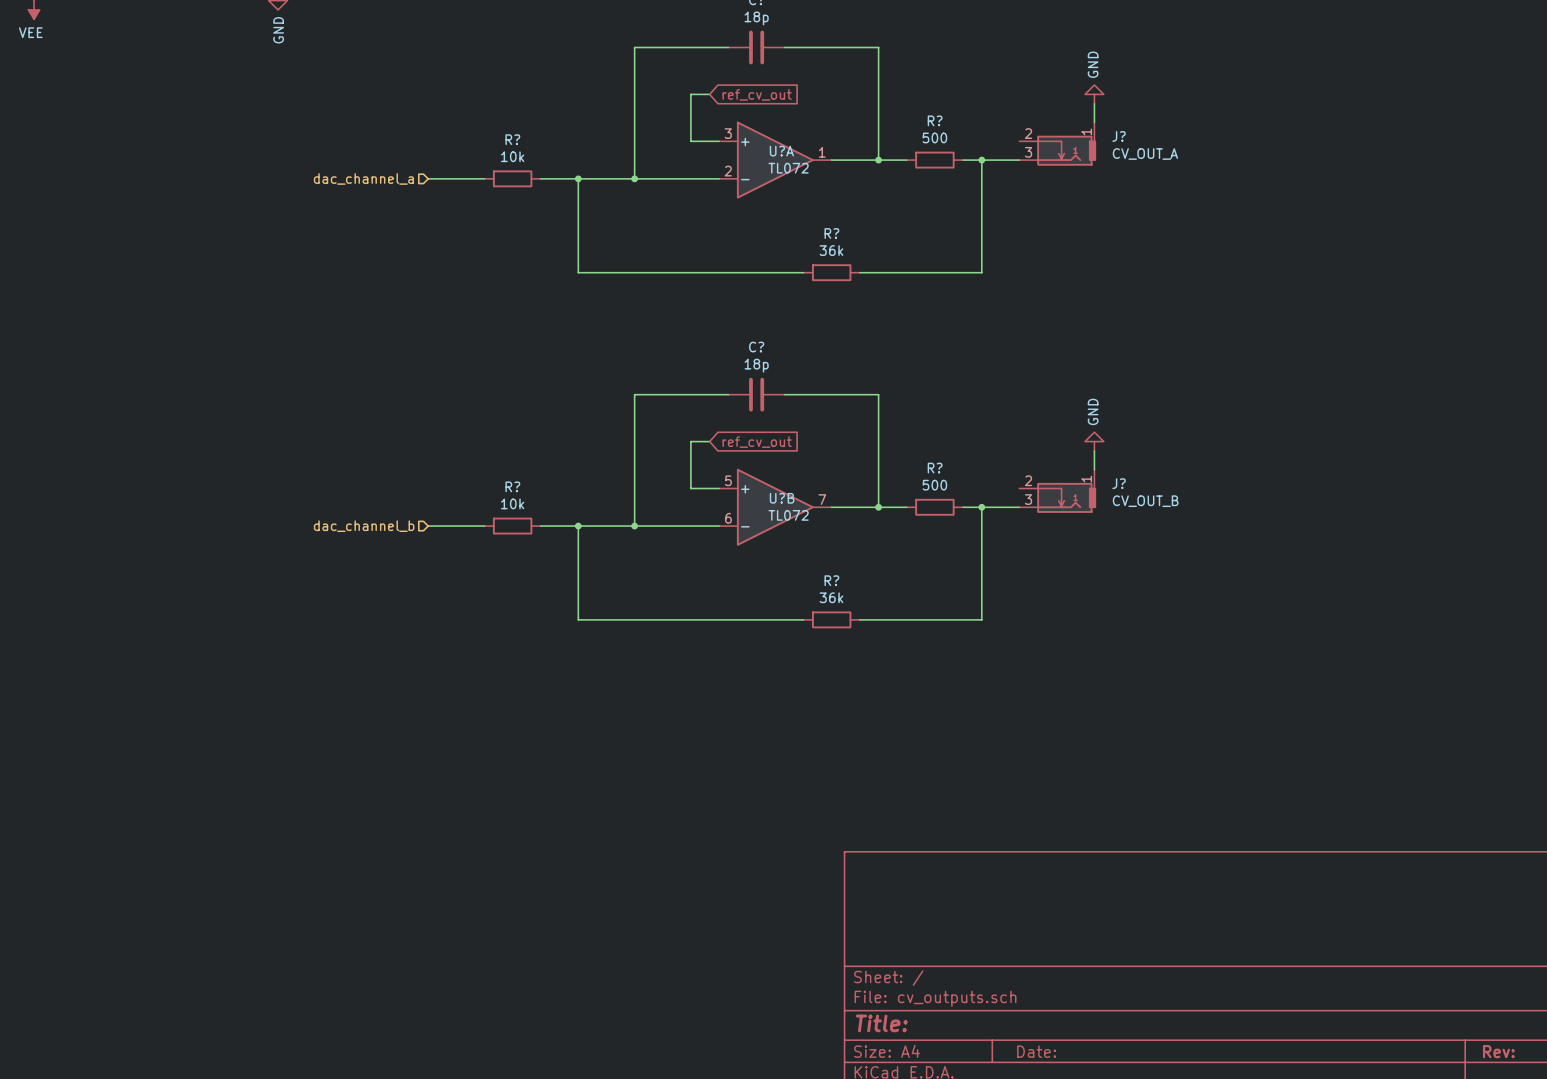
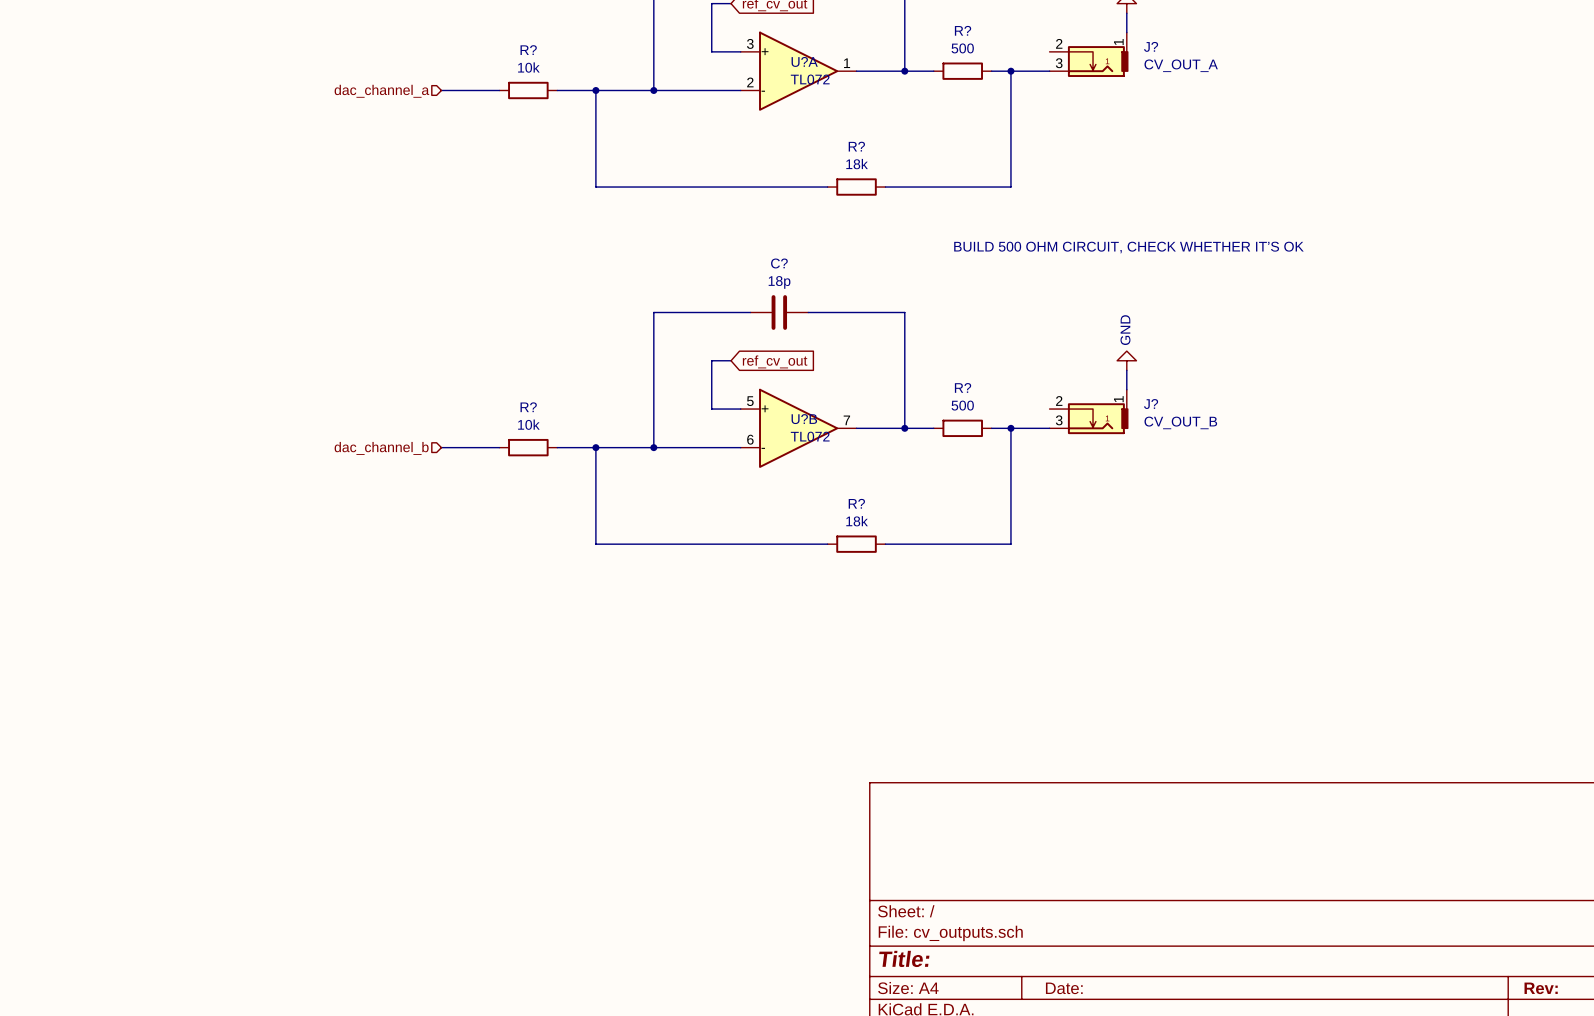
R? value: 36k (831, 250) -> 18k (857, 164)
text: none -> BUILD 500 OHM CIRCUIT, CHECK WHETHER IT’S OK (1128, 247)
R? value: 36k (831, 597) -> 18k (857, 521)

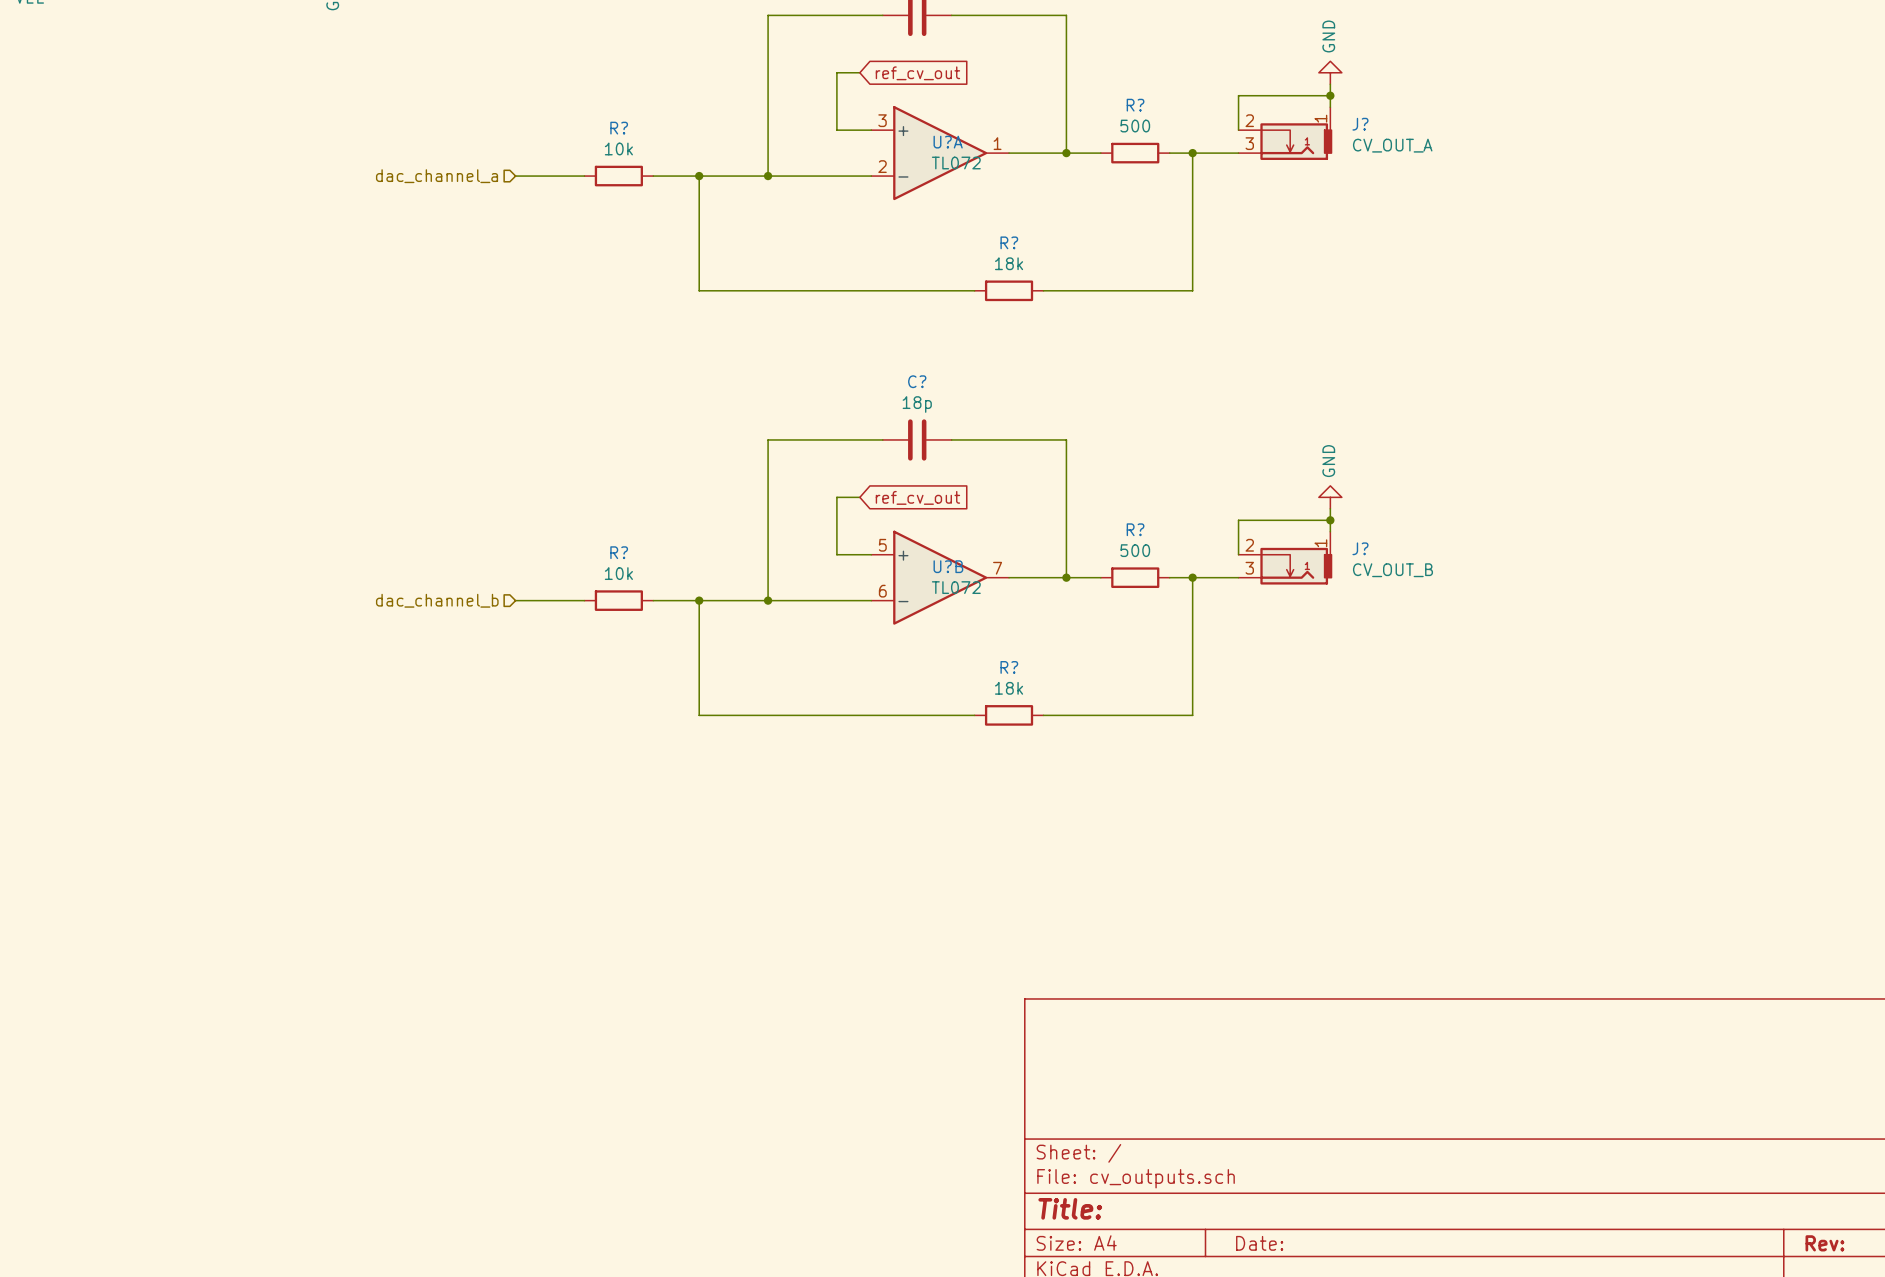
wire: none -> (1330, 95) (1238, 95) (1238, 130)
junction: none -> (1330, 95)
text: BUILD 500 OHM CIRCUIT, CHECK WHETHER IT’S OK (1128, 247) -> none
wire: none -> (1330, 520) (1238, 520) (1238, 554)
junction: none -> (1330, 520)

